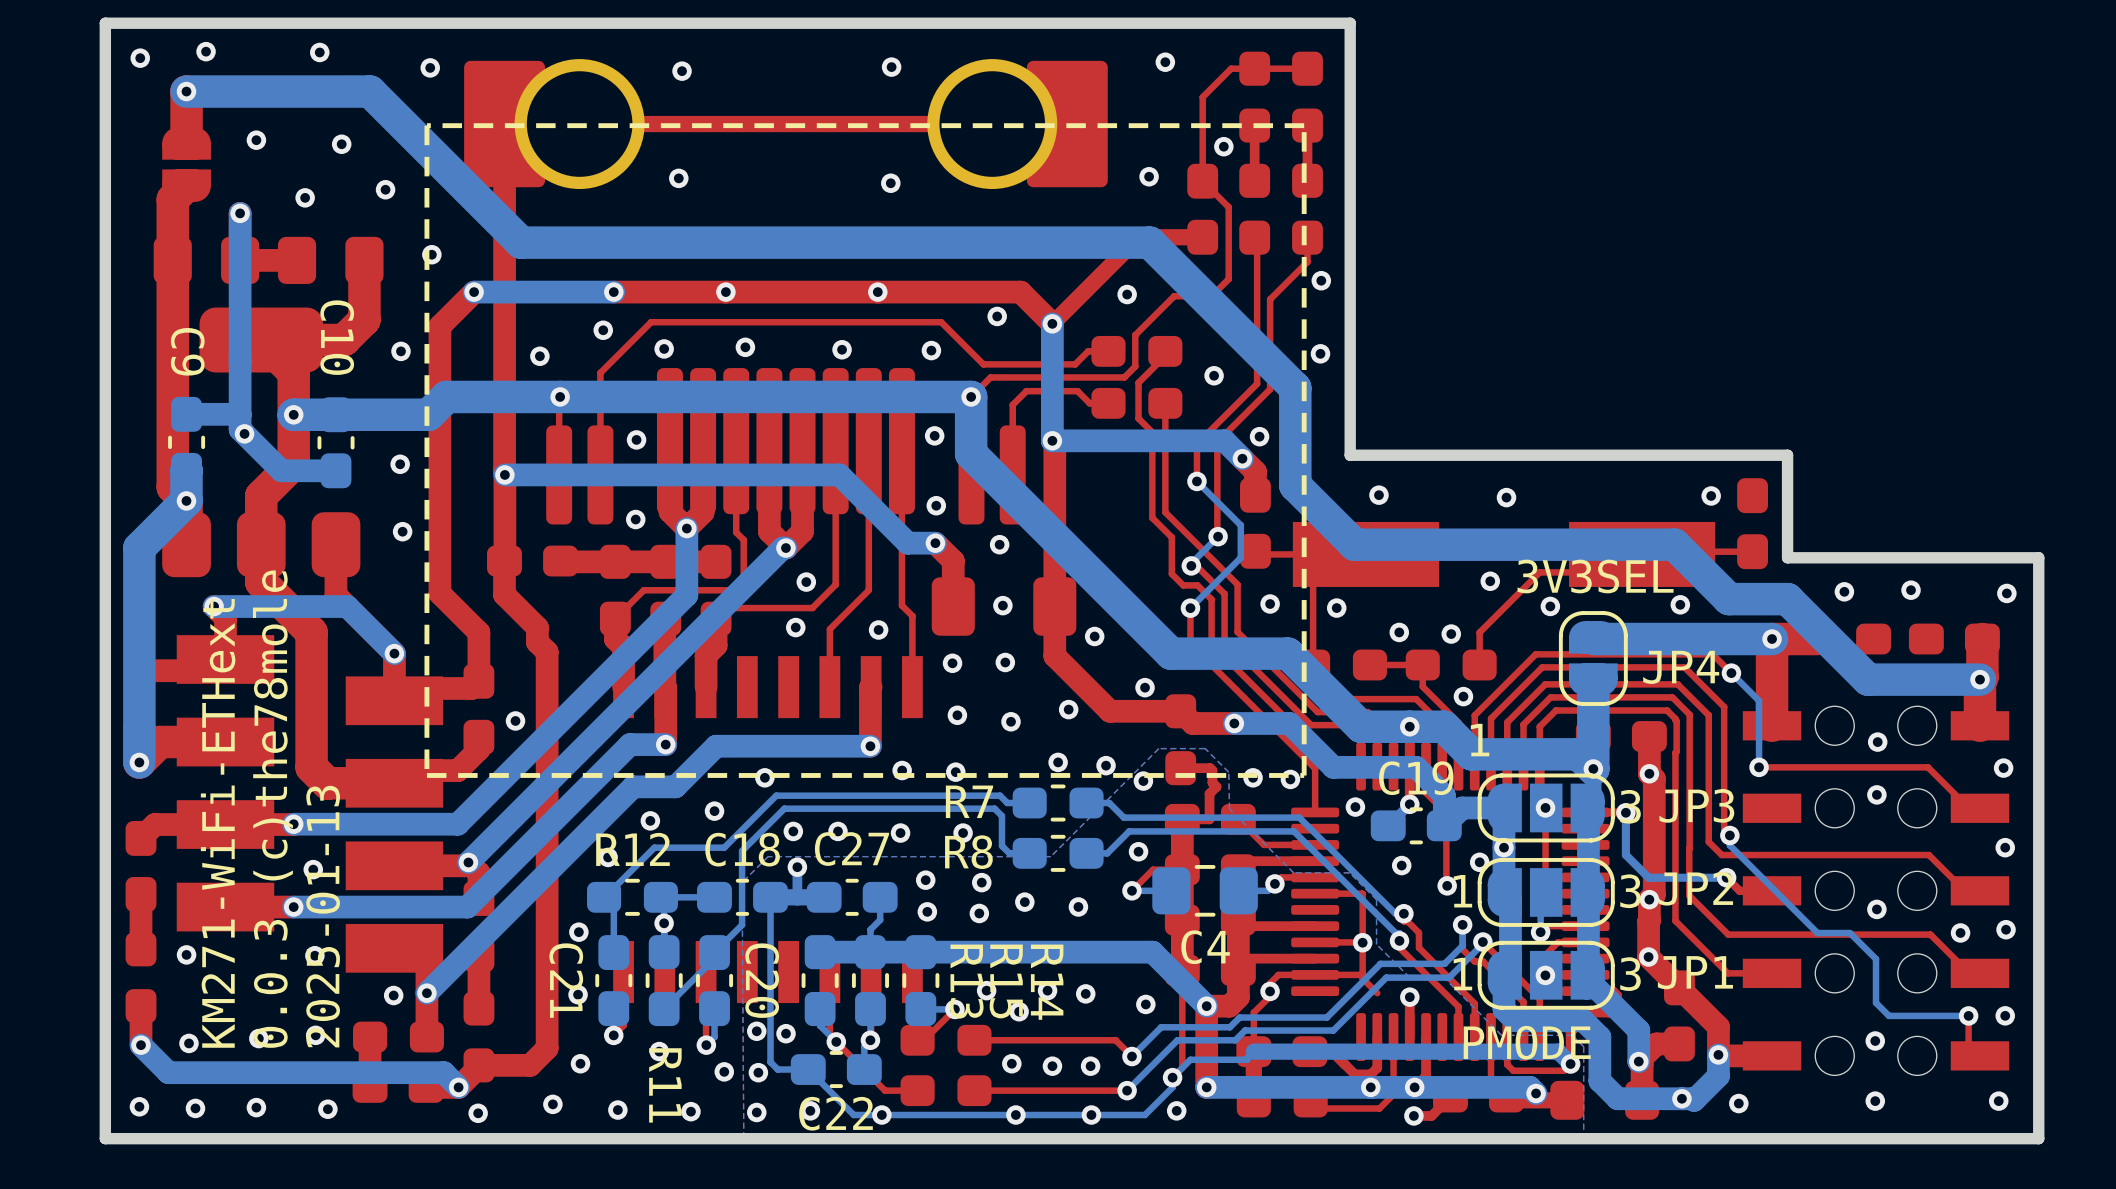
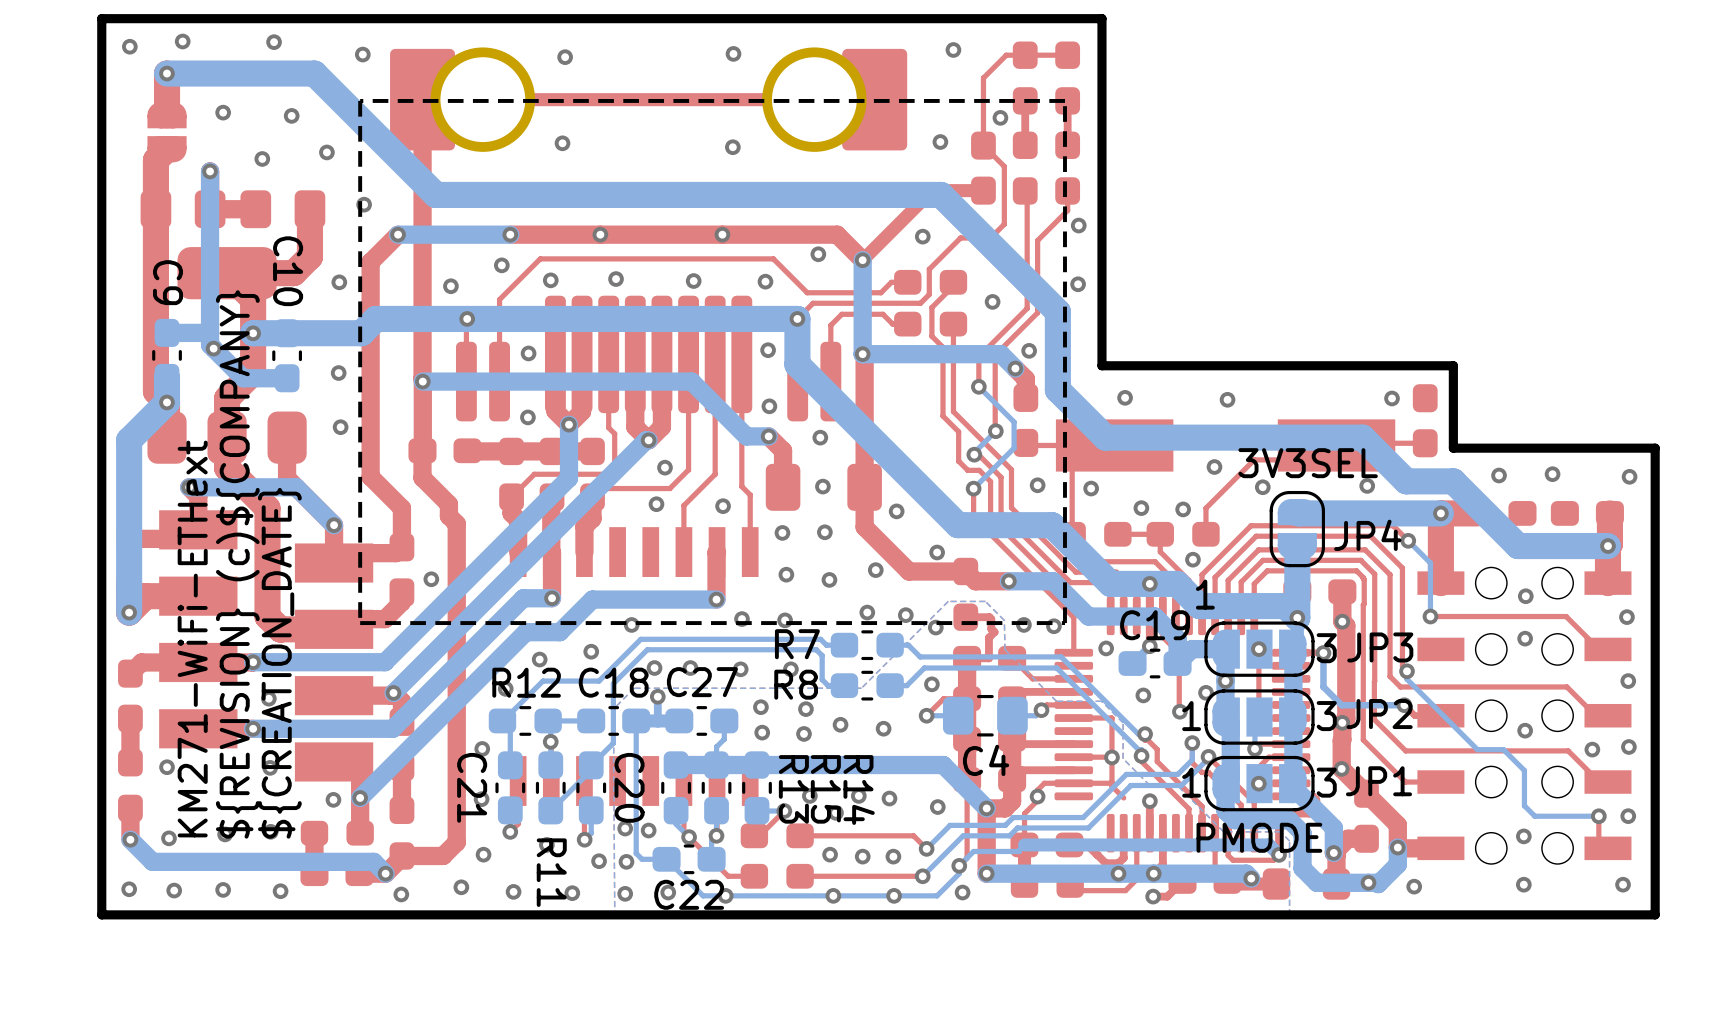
text: 0.0.3 (c)the78mole (272, 809) -> ${REVISION} (c)${COMPANY} (237, 564)
text: 2025-01-13 (323, 916) -> ${CREATION_DATE} (279, 663)

